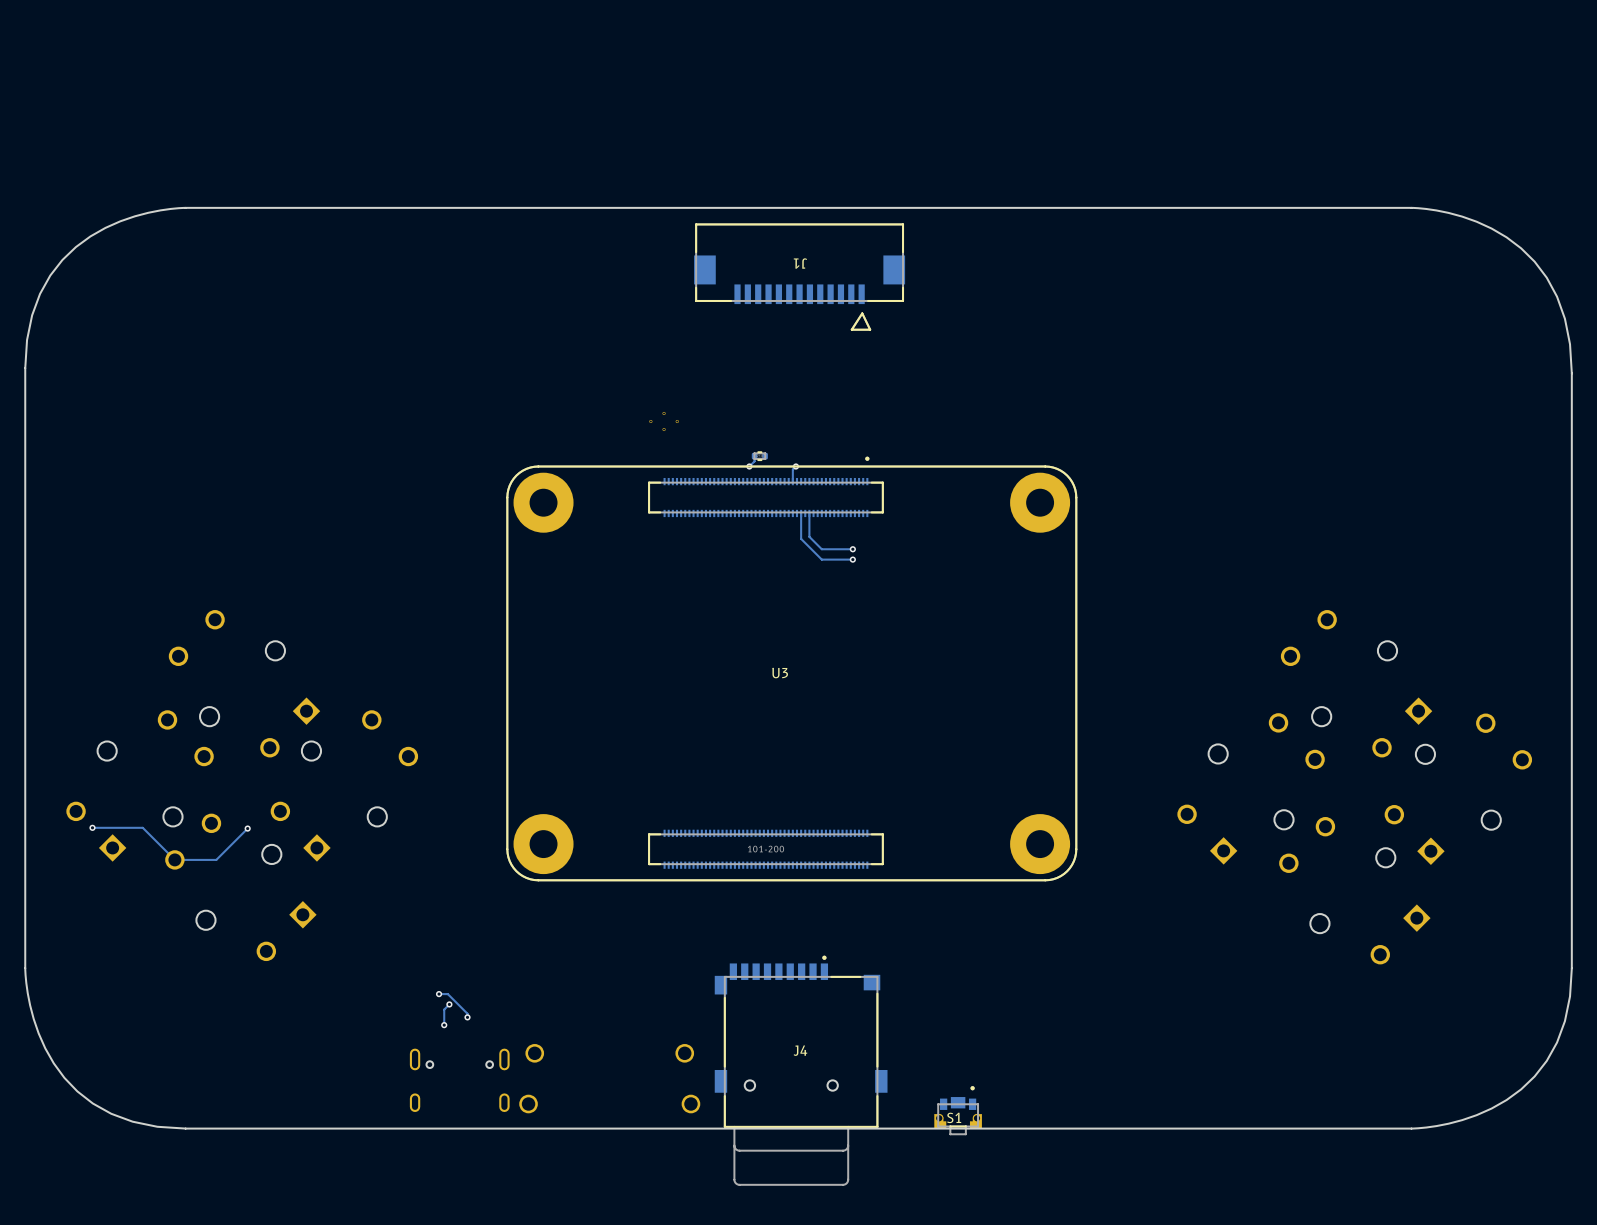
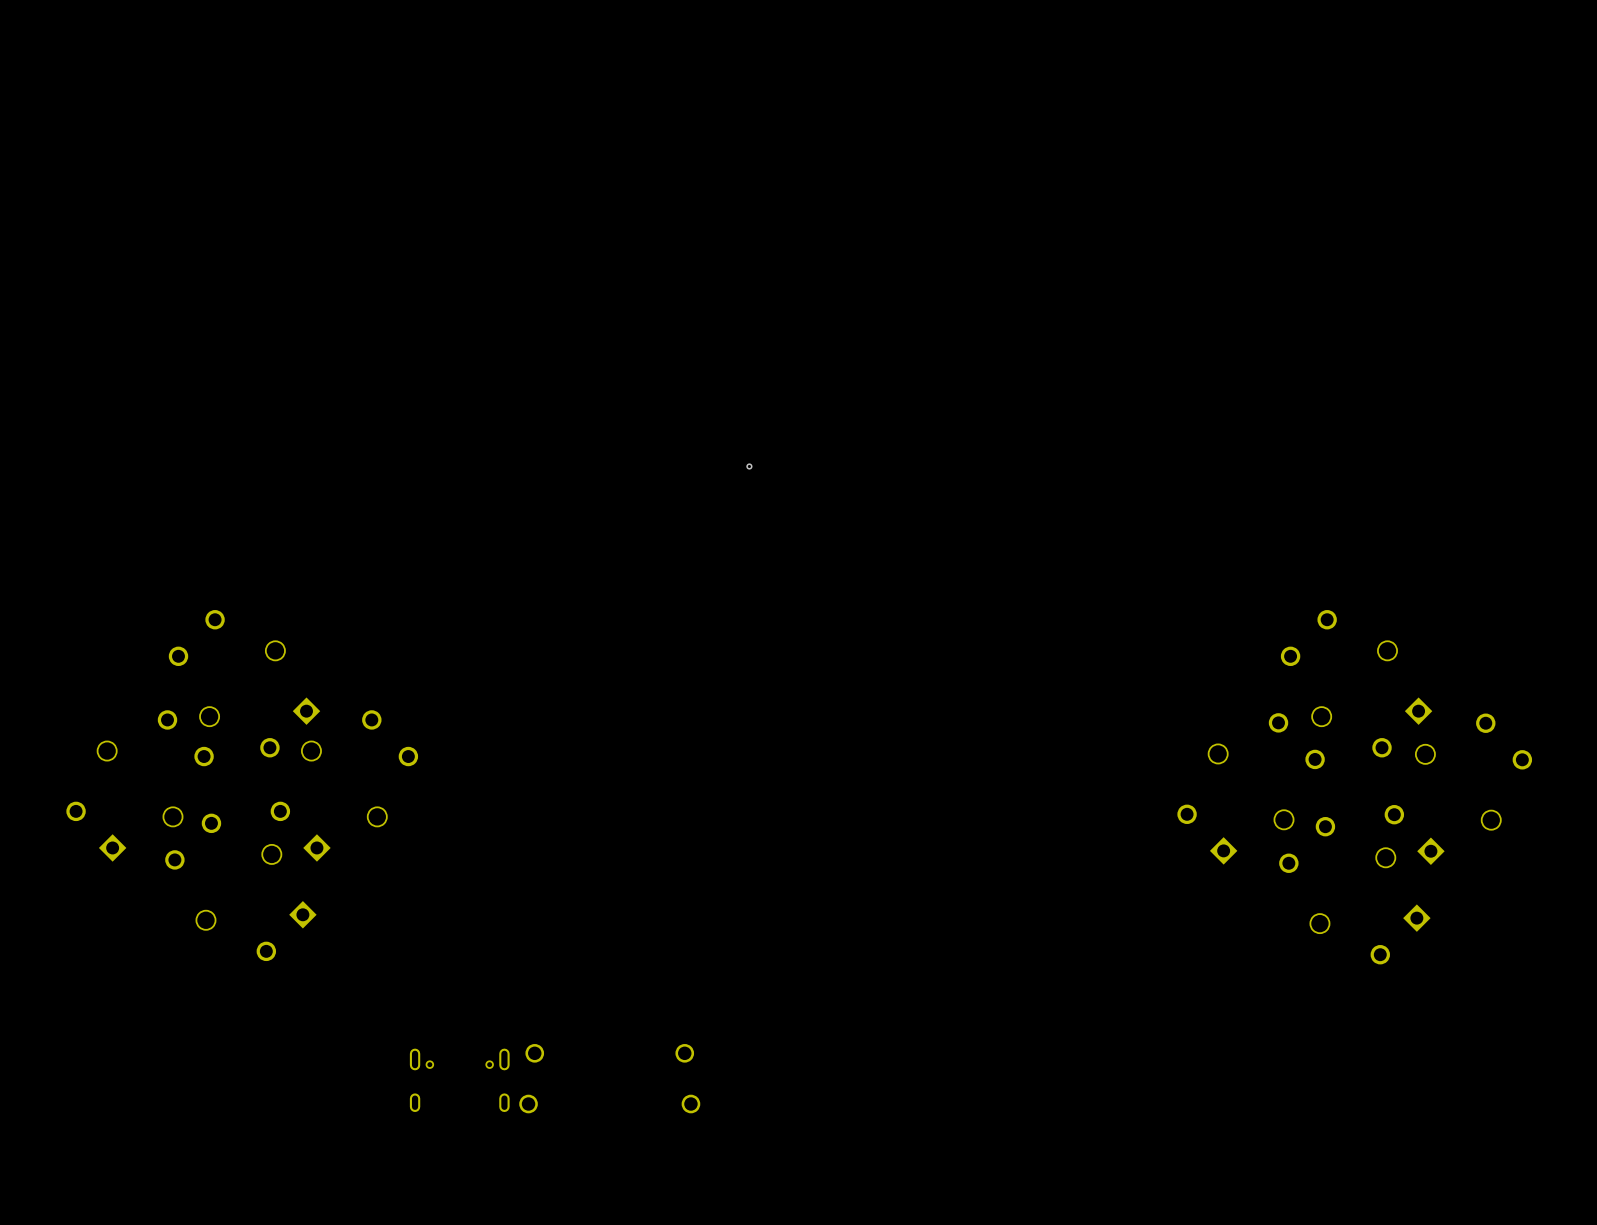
board edge: (1411, 207) (185, 207) (160, 210) (134, 216) (105, 227) (90, 236) (62, 259) (50, 275) (40, 293) (32, 315) (27, 339) (25, 368) (25, 970) (27, 993) (33, 1018) (45, 1048) (53, 1063) (77, 1091) (92, 1103) (111, 1113) (132, 1121) (157, 1126) (185, 1128) (1411, 1128) (1436, 1126) (1462, 1120) (1491, 1108) (1506, 1100) (1534, 1076) (1546, 1060) (1557, 1042) (1564, 1021) (1570, 996) (1571, 968) (1571, 373) (1570, 344) (1564, 318) (1557, 296) (1546, 277) (1521, 248) (1506, 237) (1476, 221) (1448, 212) (1411, 207) -> none
J1: (799, 277) -> none
part: (664, 421) -> none
track: (754, 456) (754, 461) (749, 466) -> none
part: (759, 456) -> none
track: (795, 466) (792, 469) (792, 481) -> none
via: (795, 466) -> none
track: (801, 513) (801, 538) (821, 559) (852, 559) -> none
track: (809, 513) (809, 536) (821, 549) (852, 549) -> none
via: (852, 549) -> none
via: (852, 559) -> none
U3: (791, 668) -> none
track: (92, 827) (142, 827) (174, 859) (216, 859) (247, 828) -> none
via: (92, 827) -> none
via: (247, 828) -> none
track: (439, 994) (447, 994) (467, 1013) (467, 1017) -> none
via: (439, 994) -> none
track: (449, 1004) (444, 1009) (444, 1025) -> none
via: (449, 1004) -> none
via: (467, 1017) -> none
via: (444, 1025) -> none
J4: (801, 1070) -> none
S1: (958, 1110) -> none

